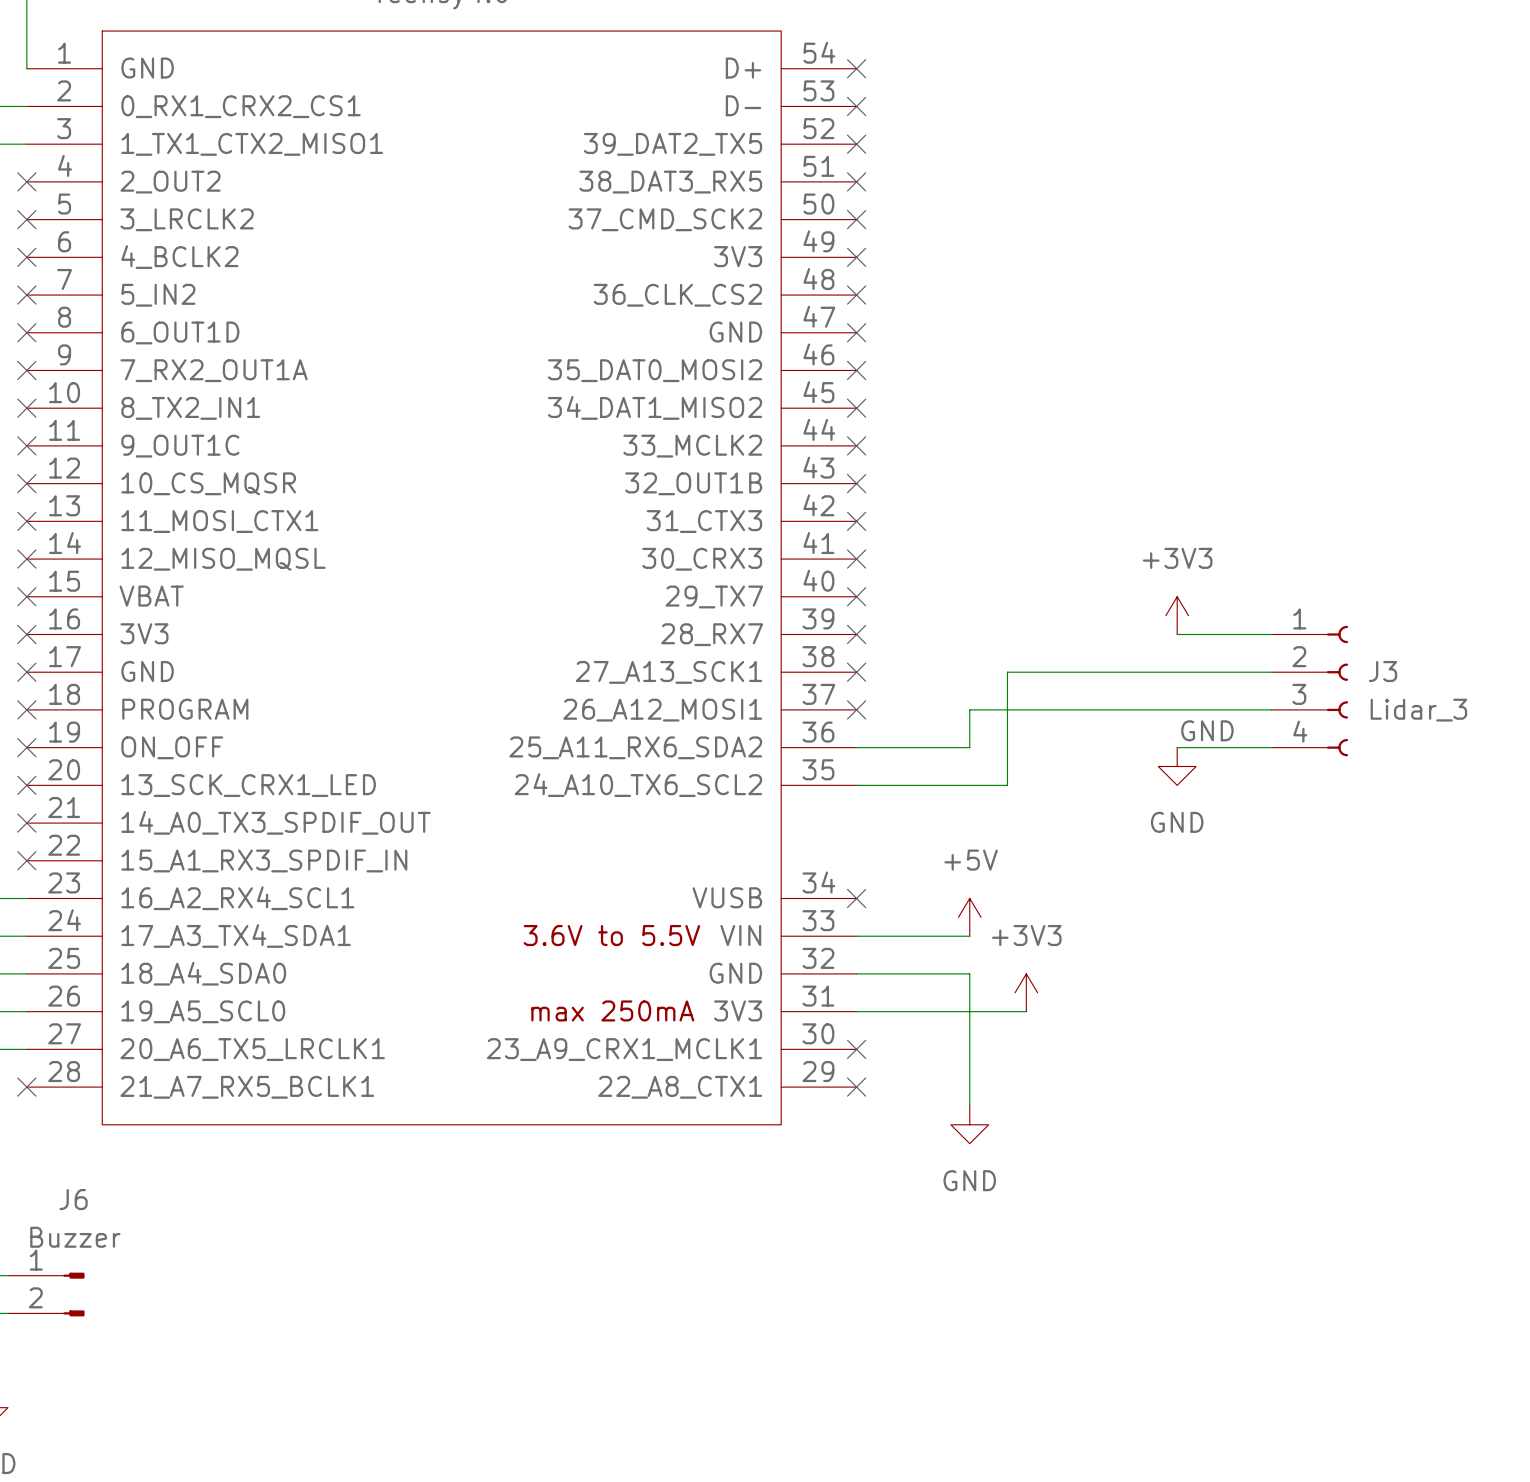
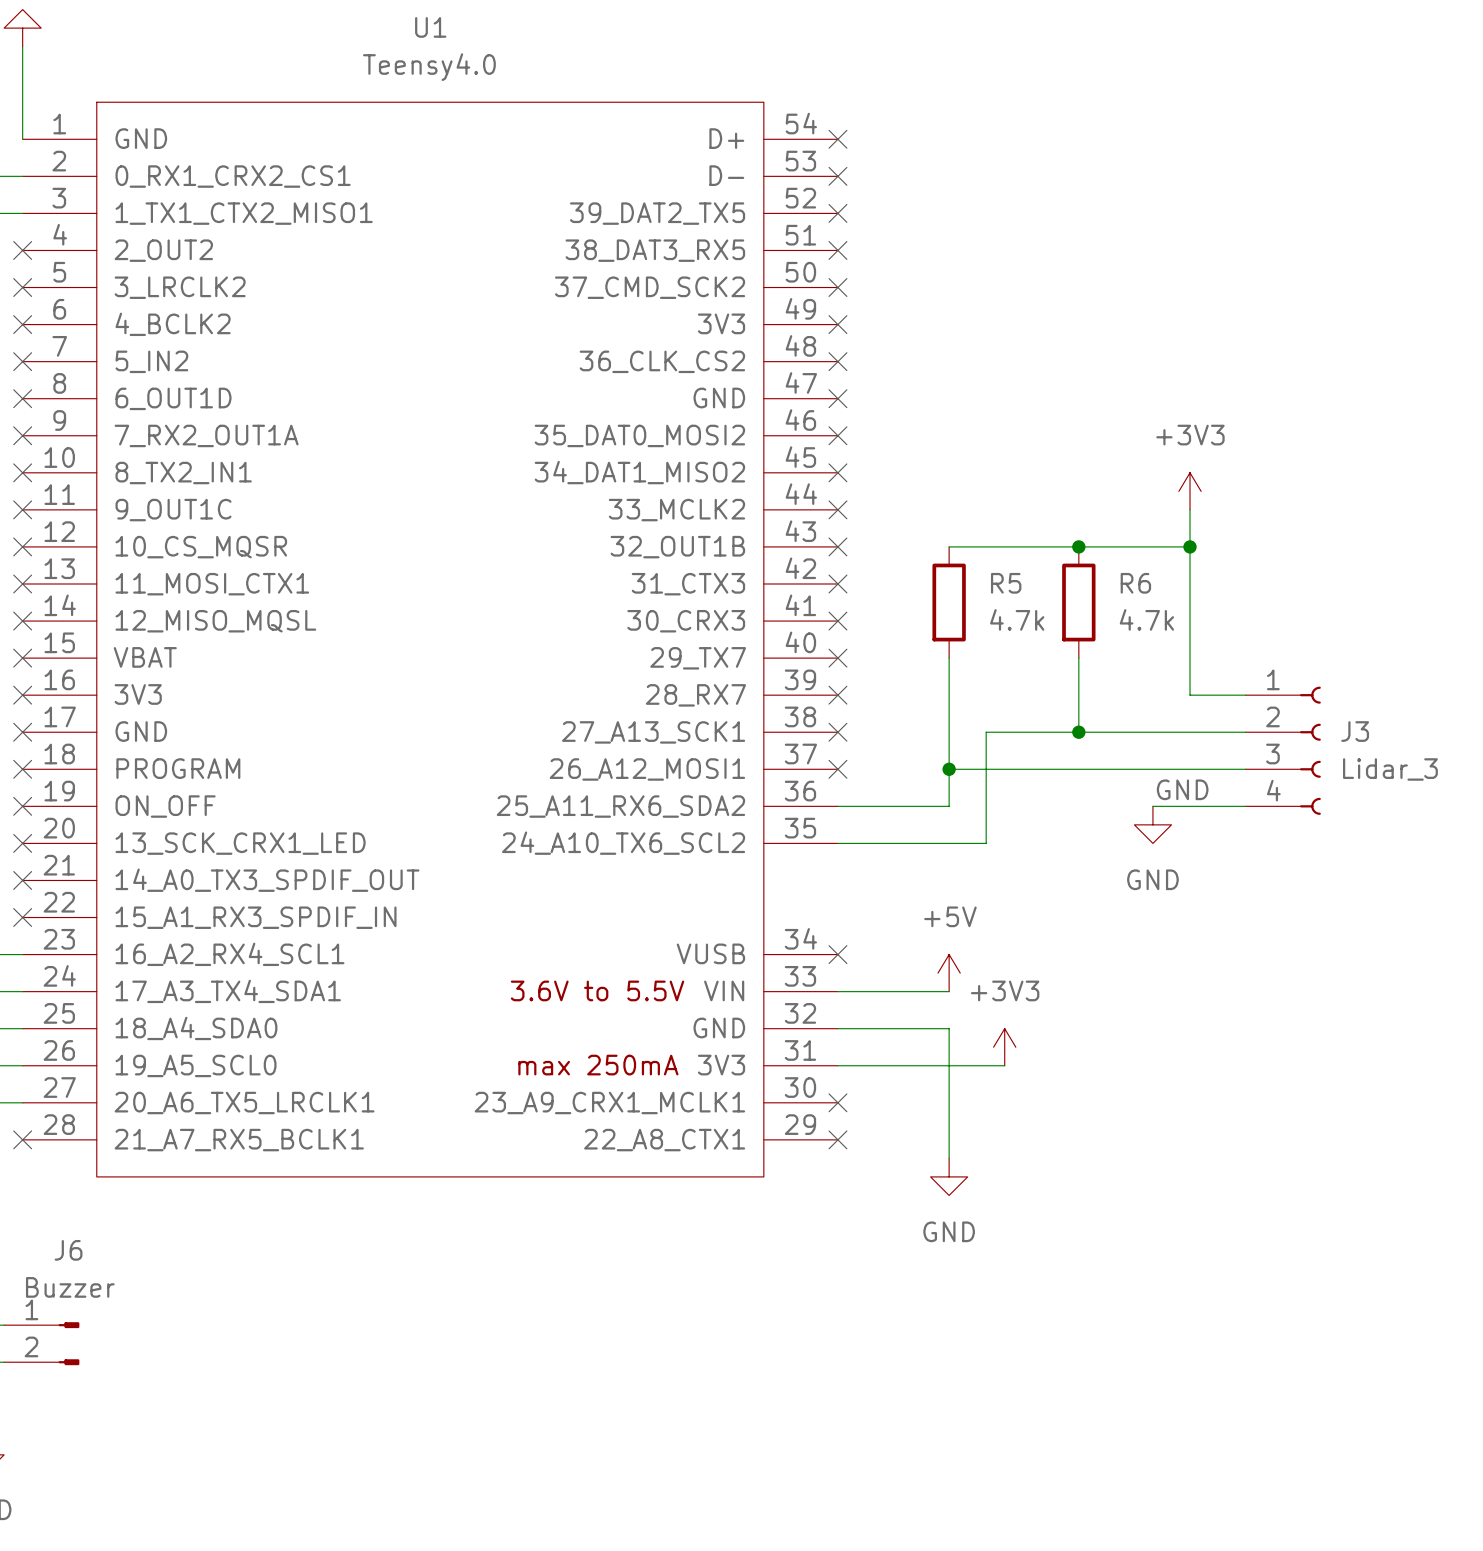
wire: none -> (949, 546) (1190, 546)
junction: none -> (1078, 546)
junction: none -> (1190, 546)
R5: none -> 4.7k (949, 602)
R6: none -> 4.7k (1078, 602)
wire: none -> (949, 658) (949, 769)
wire: none -> (1078, 658) (1078, 732)
power symbol position: +3V3 (1177, 615) -> +3V3 (1190, 491)
wire: (1177, 634) (1214, 634) -> (1190, 509) (1190, 695)
junction: none -> (1078, 732)
junction: none -> (949, 769)

